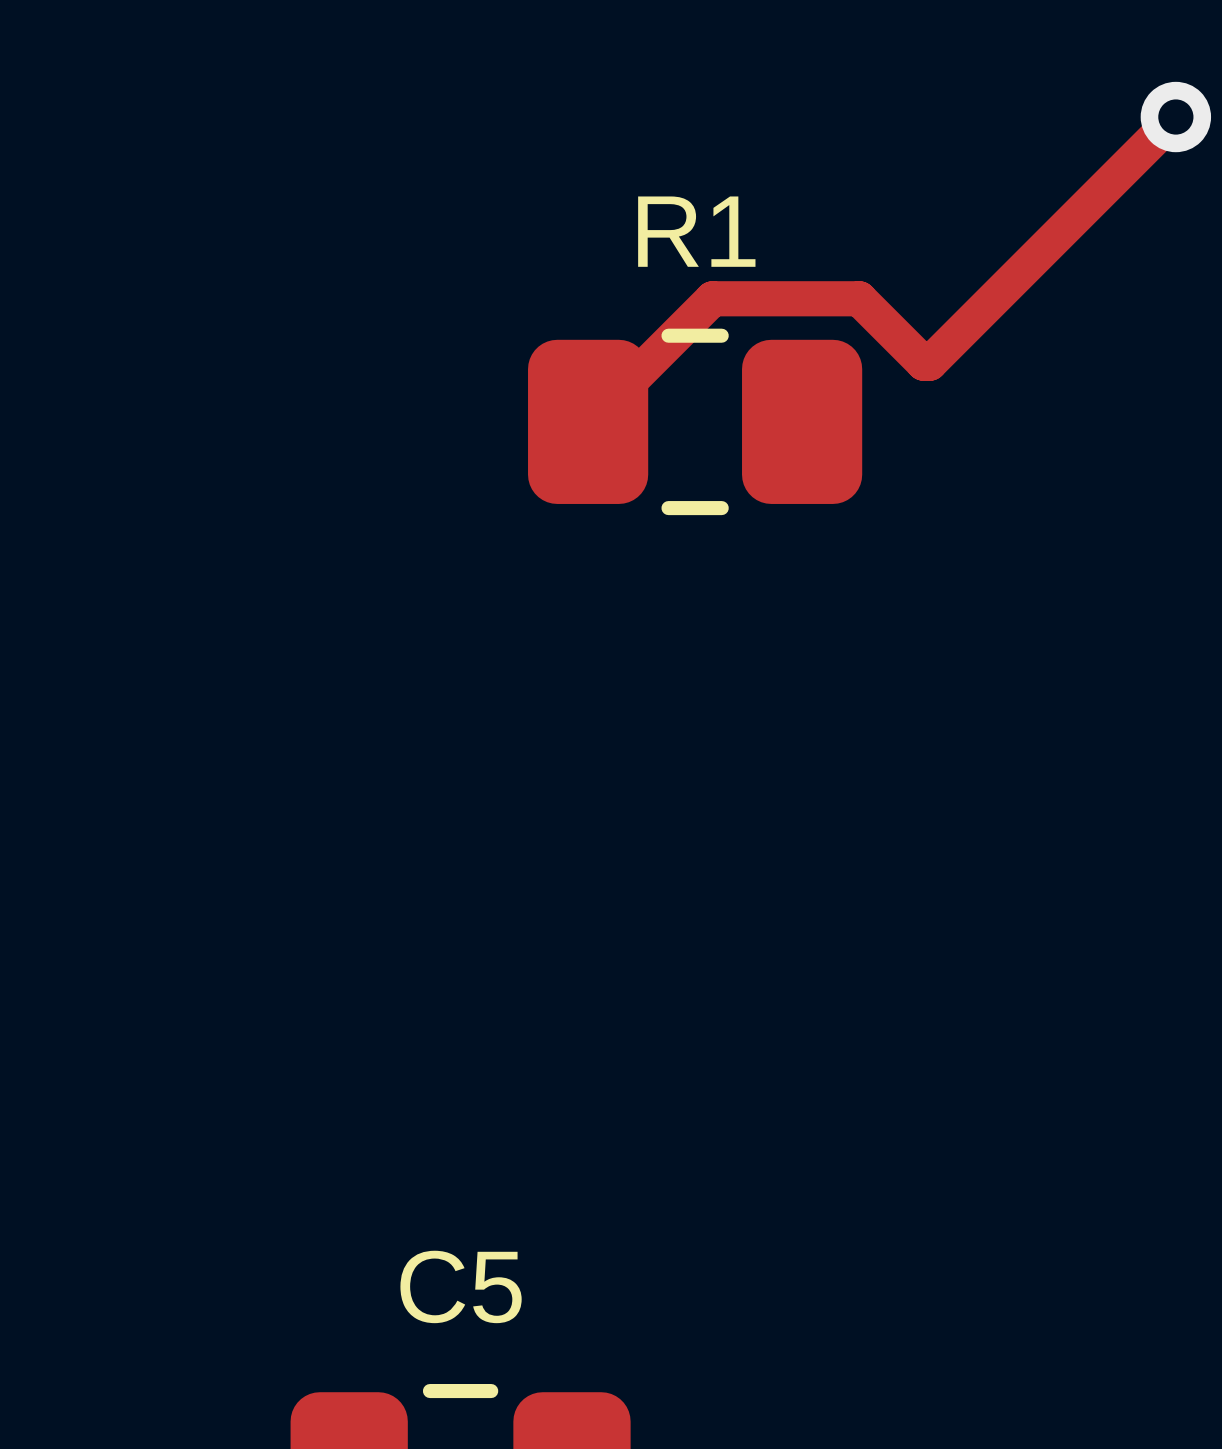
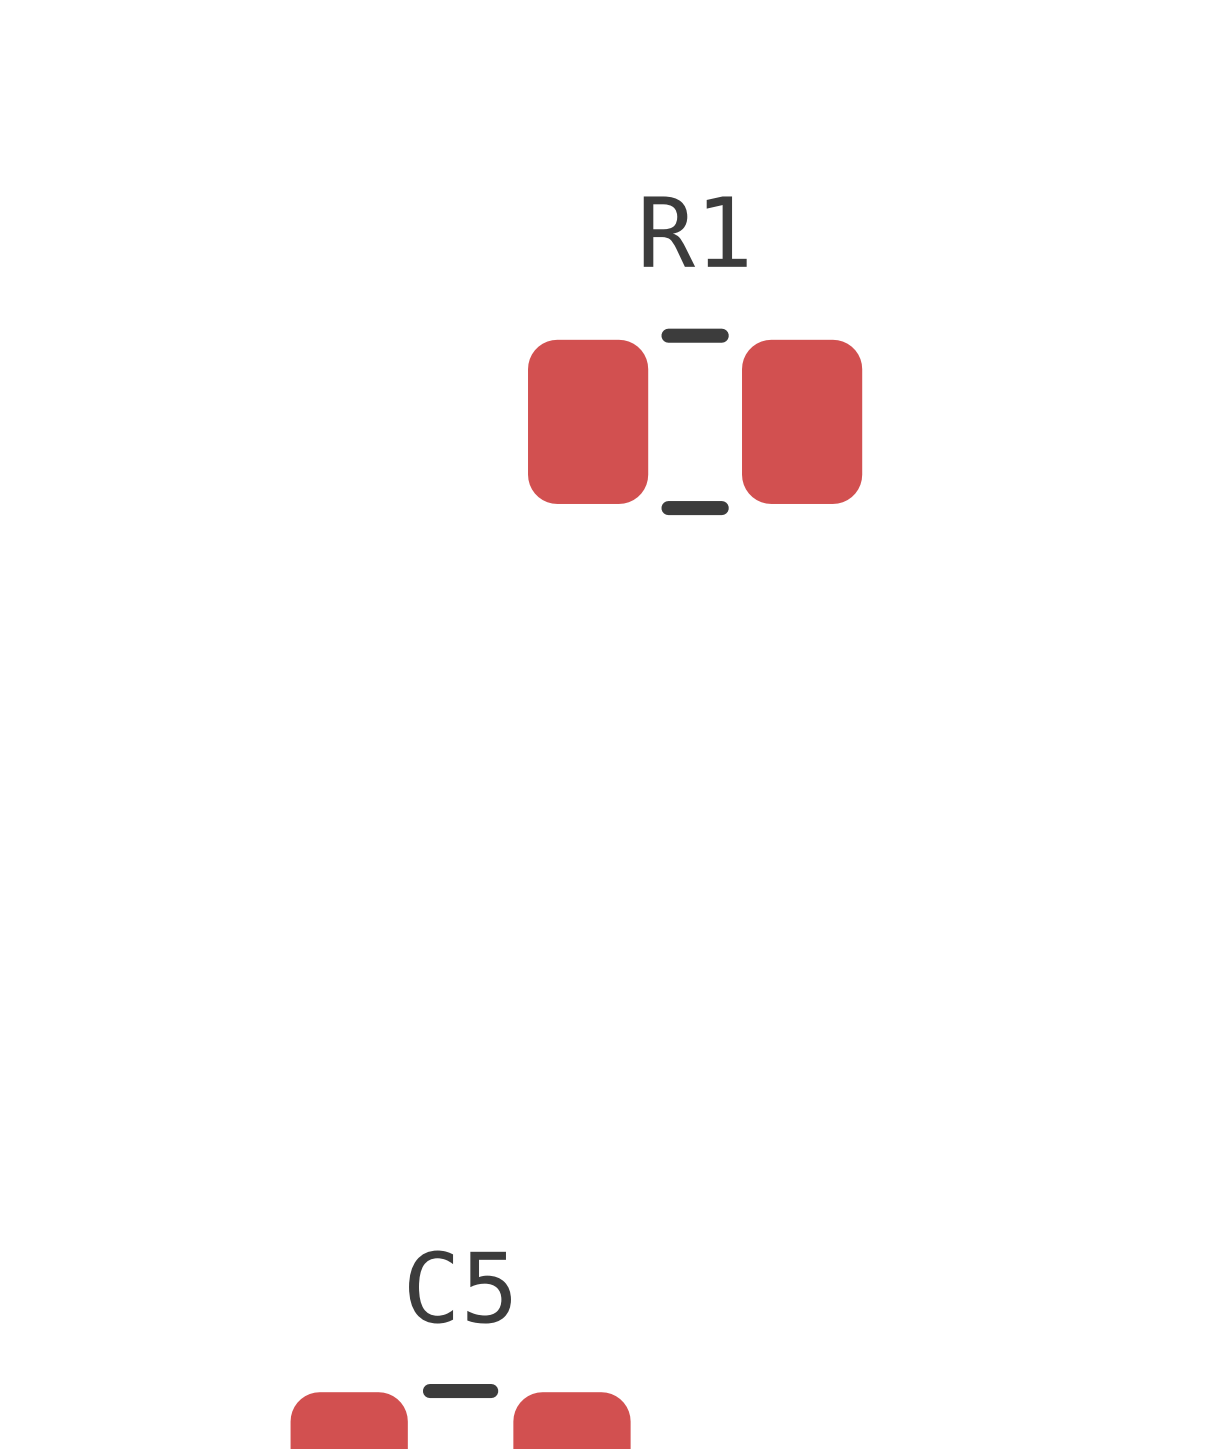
track: (1175, 117) (929, 363) (923, 363) (859, 298) (712, 298) (589, 421) -> none
via: (1175, 117) -> none

